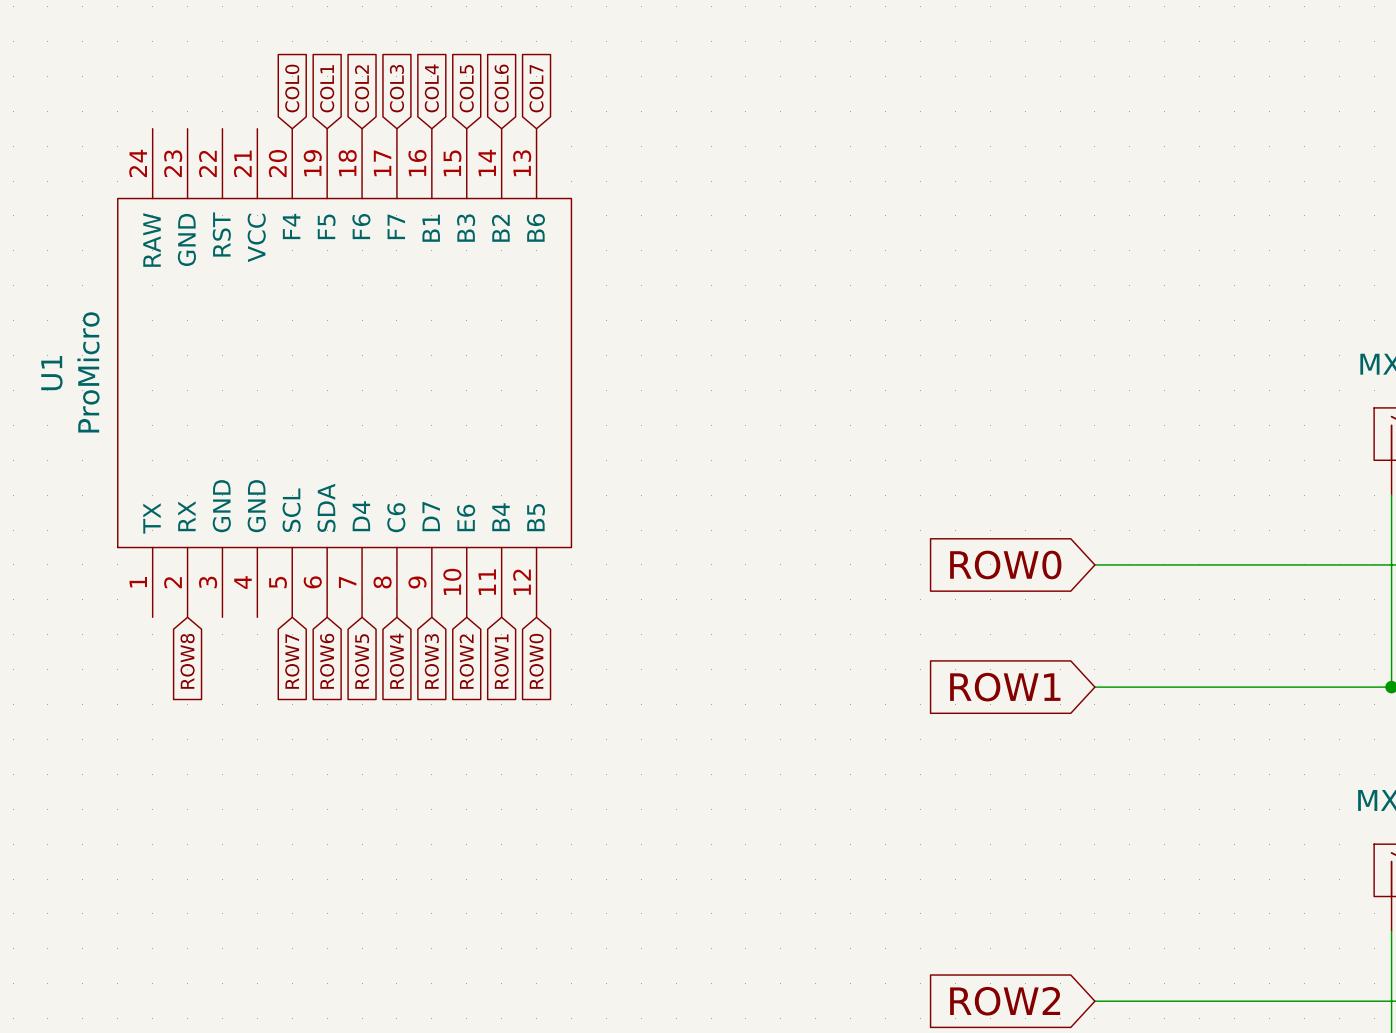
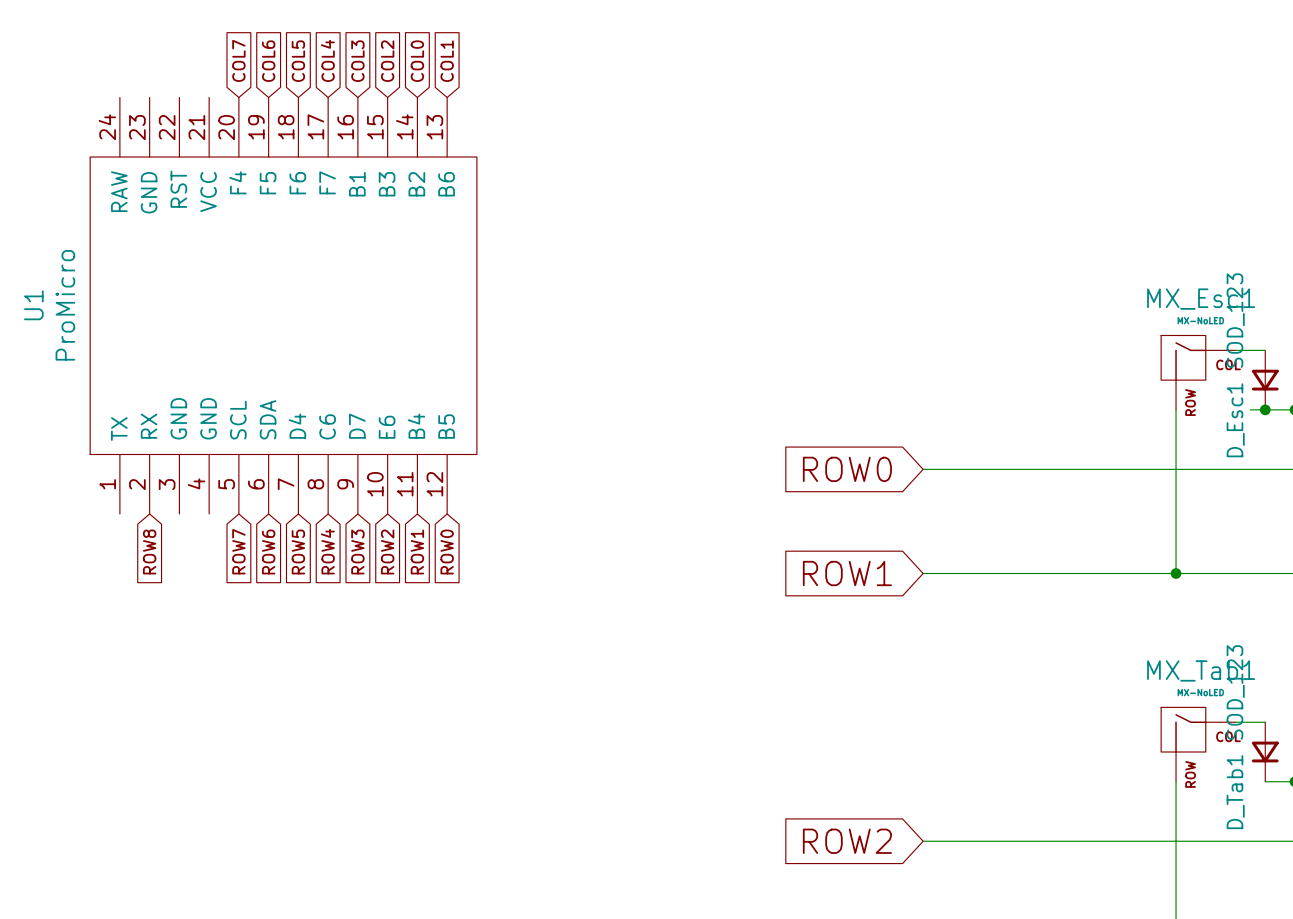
global label: COL0 (292, 88) -> COL7 (238, 60)
global label: COL1 (327, 88) -> COL6 (268, 61)
global label: COL2 (362, 88) -> COL5 (298, 61)
global label: COL3 (396, 88) -> COL4 (327, 60)
global label: COL4 (431, 88) -> COL3 (357, 61)
global label: COL5 (466, 88) -> COL2 (387, 61)
global label: COL6 (501, 88) -> COL0 (417, 61)
global label: COL7 (536, 88) -> COL1 (447, 61)

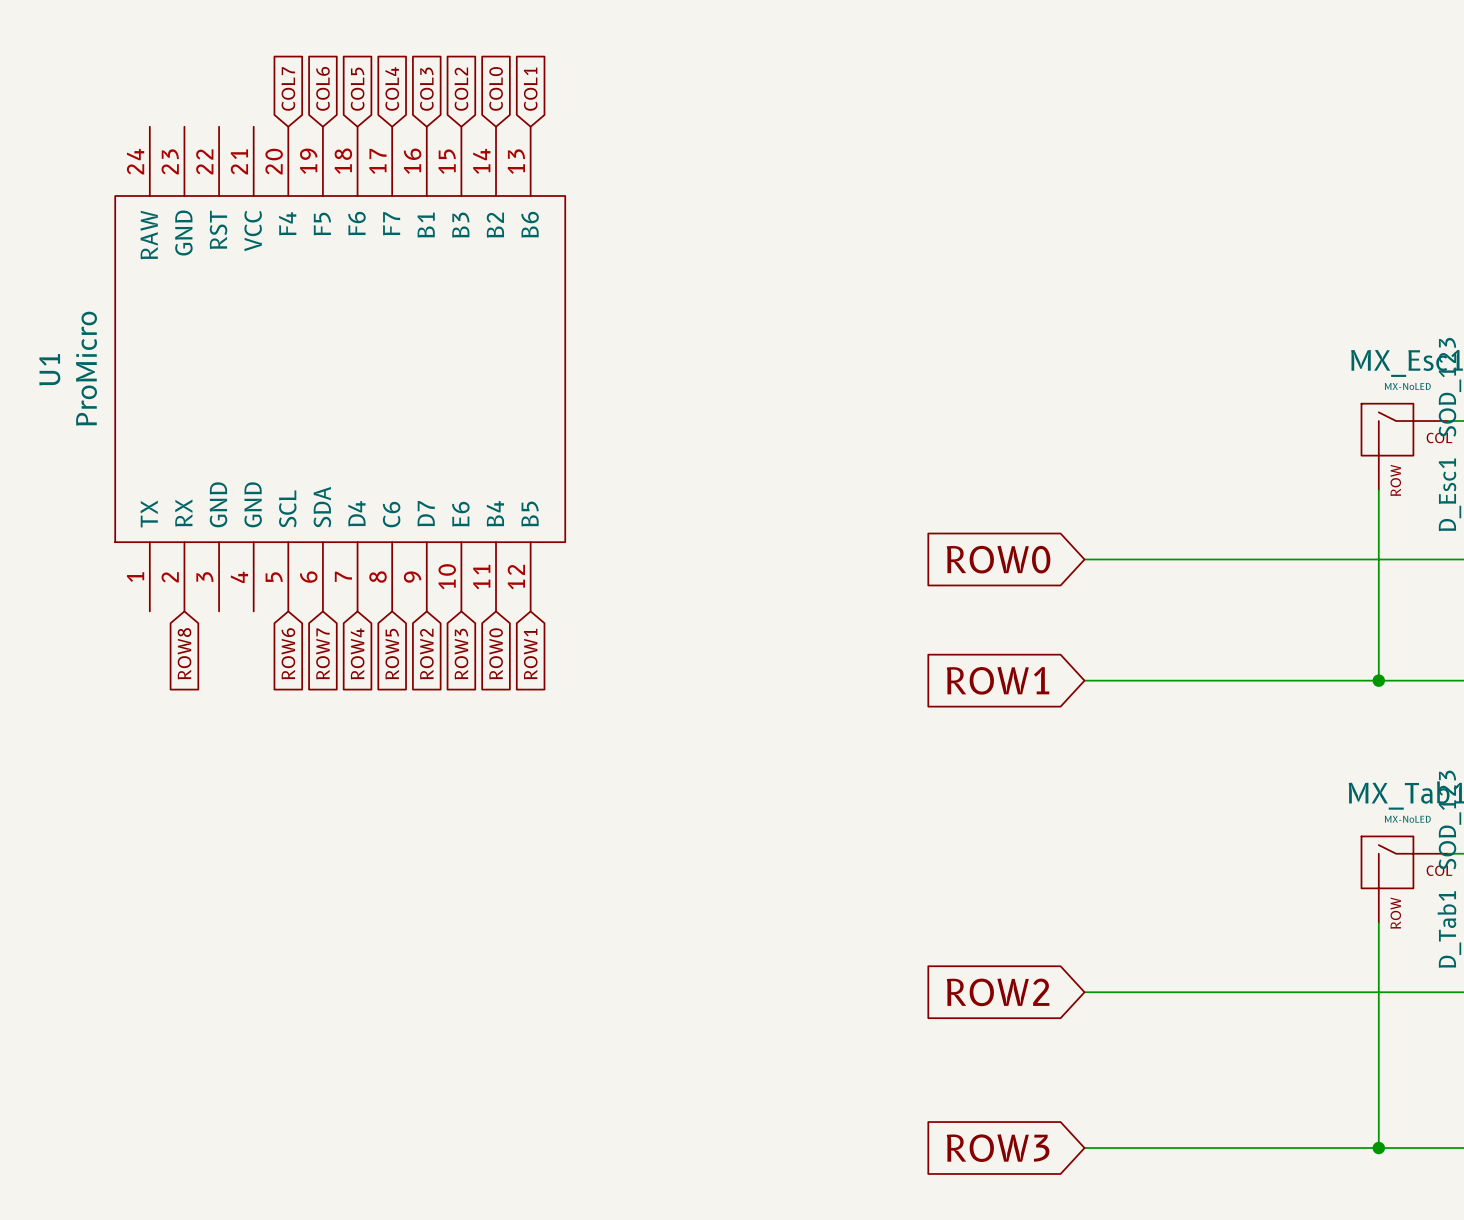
global label: ROW7 (238, 551) -> ROW6 (288, 653)
global label: ROW6 (268, 551) -> ROW7 (322, 653)
global label: ROW5 (298, 551) -> ROW4 (357, 653)
global label: ROW4 (327, 551) -> ROW5 (392, 654)
global label: ROW3 (357, 551) -> ROW2 (426, 654)
global label: ROW2 (387, 551) -> ROW3 (461, 654)
global label: ROW1 (417, 551) -> ROW0 (496, 653)
global label: ROW0 (447, 551) -> ROW1 (530, 654)

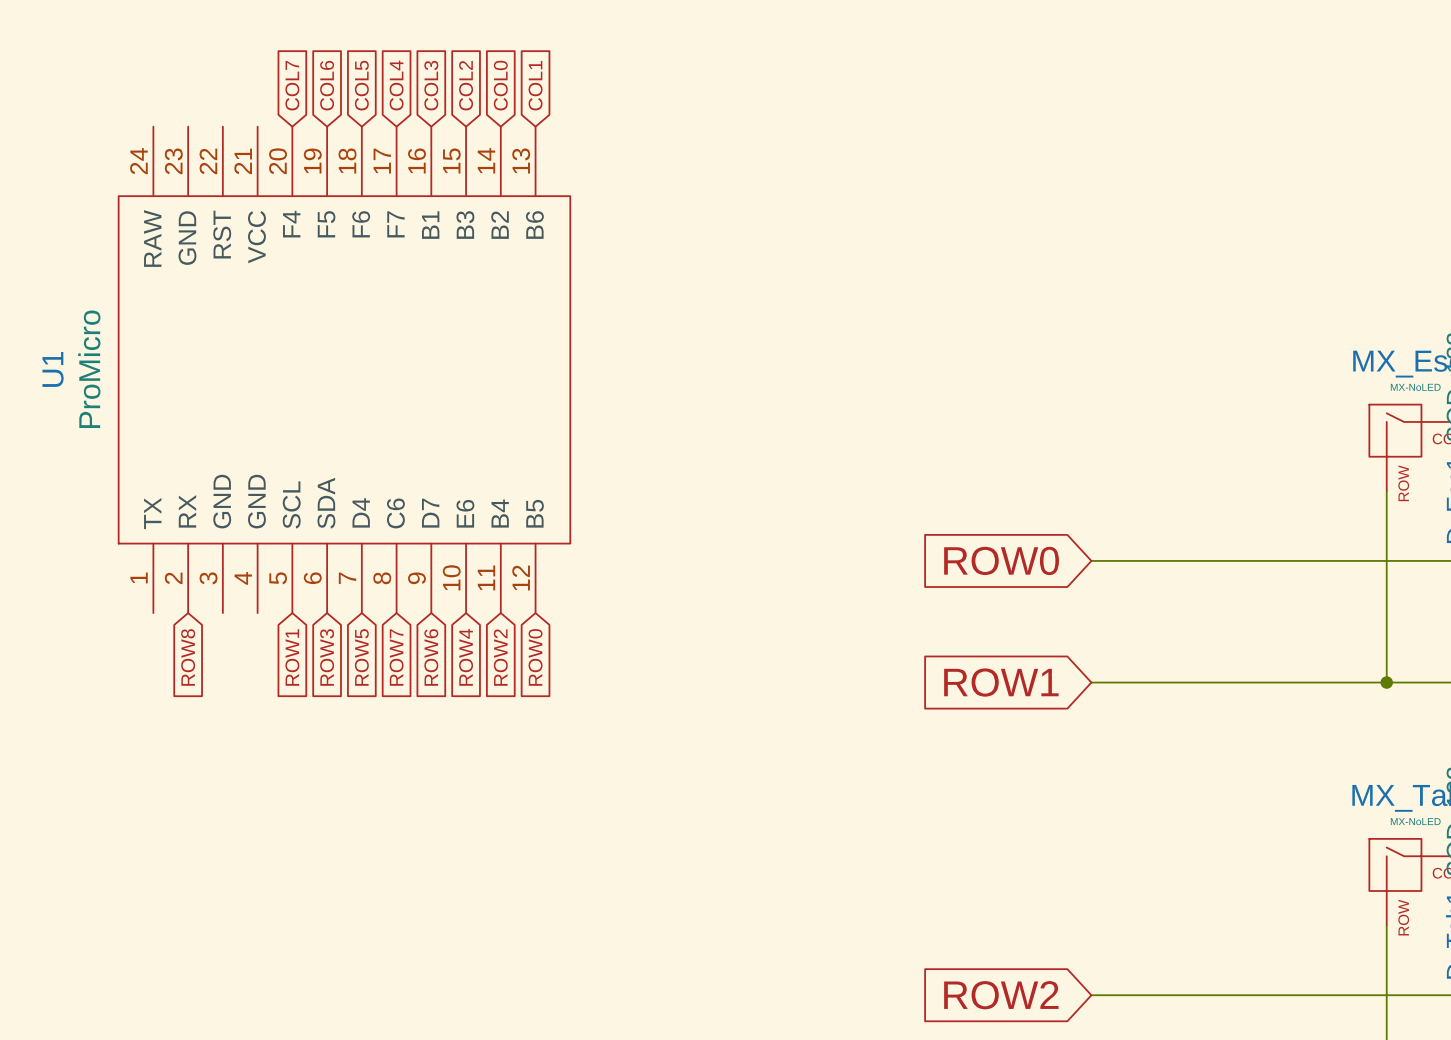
global label: ROW6 (288, 653) -> ROW1 (292, 657)
global label: ROW7 (322, 653) -> ROW3 (327, 657)
global label: ROW4 (357, 653) -> ROW5 (361, 657)
global label: ROW0 (496, 653) -> ROW2 (500, 657)
global label: ROW5 (392, 654) -> ROW7 (396, 657)
global label: ROW2 (426, 654) -> ROW6 (431, 657)
global label: ROW3 (461, 654) -> ROW4 (466, 657)
global label: ROW1 (530, 654) -> ROW0 (535, 657)

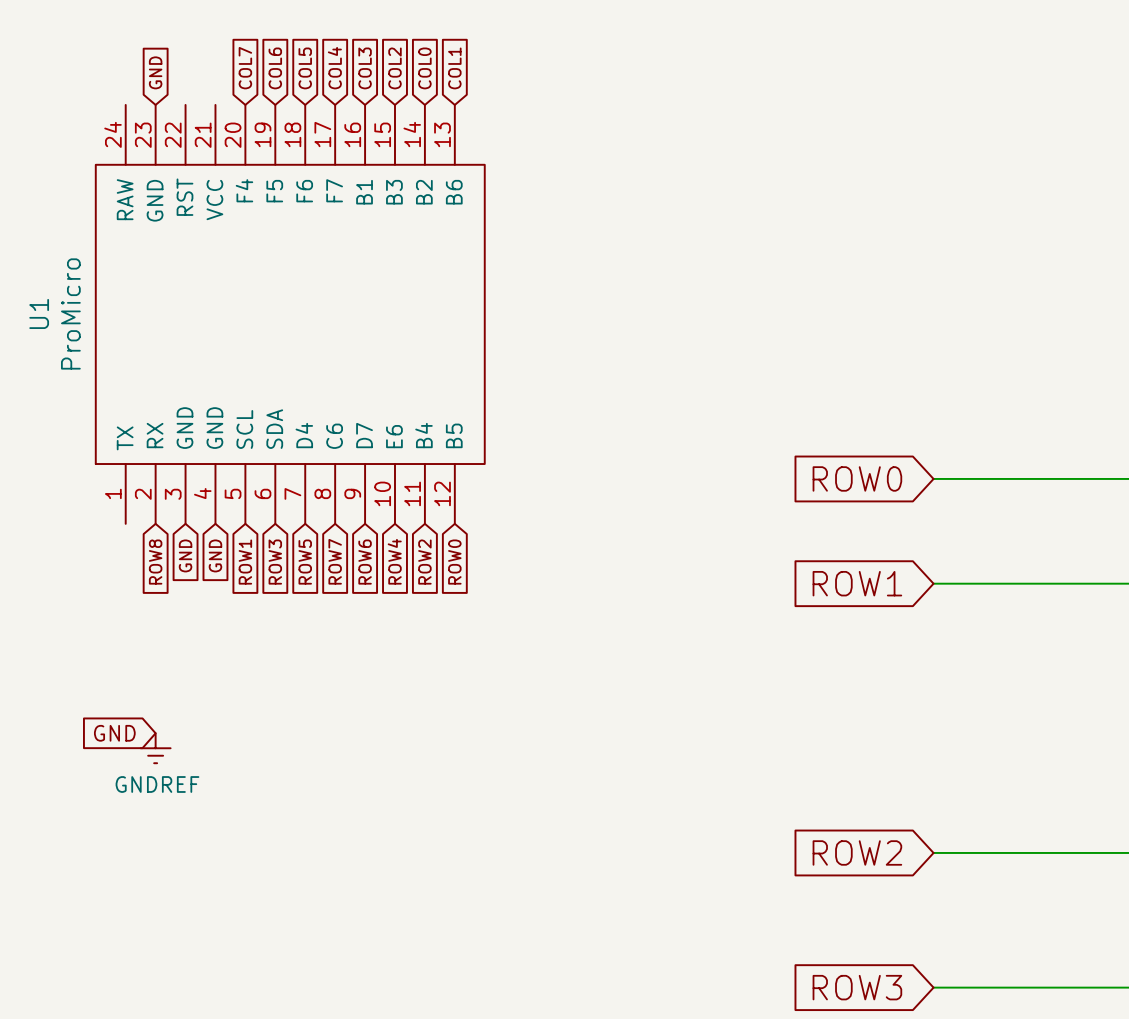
global label: none -> GND (155, 72)
global label: none -> GND (185, 555)
global label: none -> GND (215, 555)
global label: none -> GND (114, 733)
power symbol: none -> GNDREF (155, 748)

